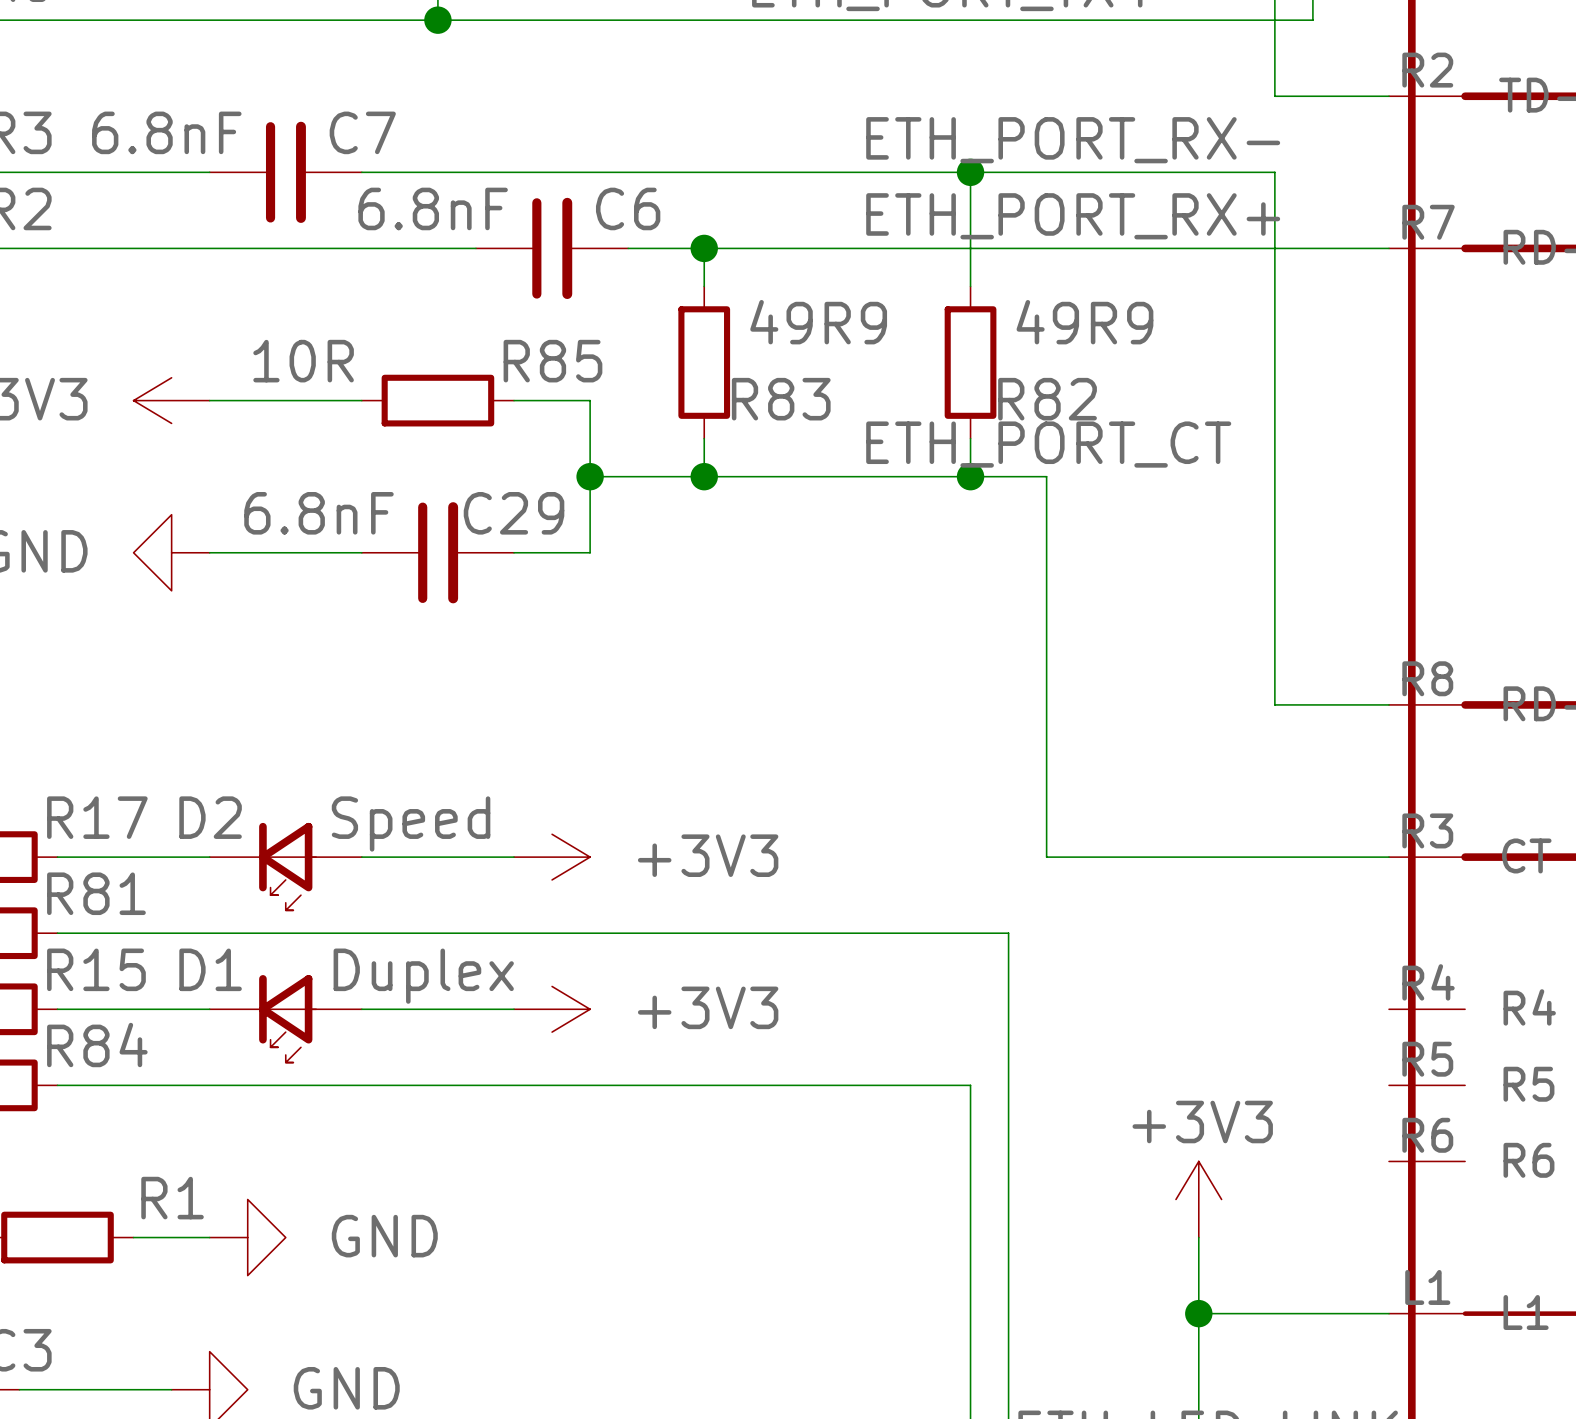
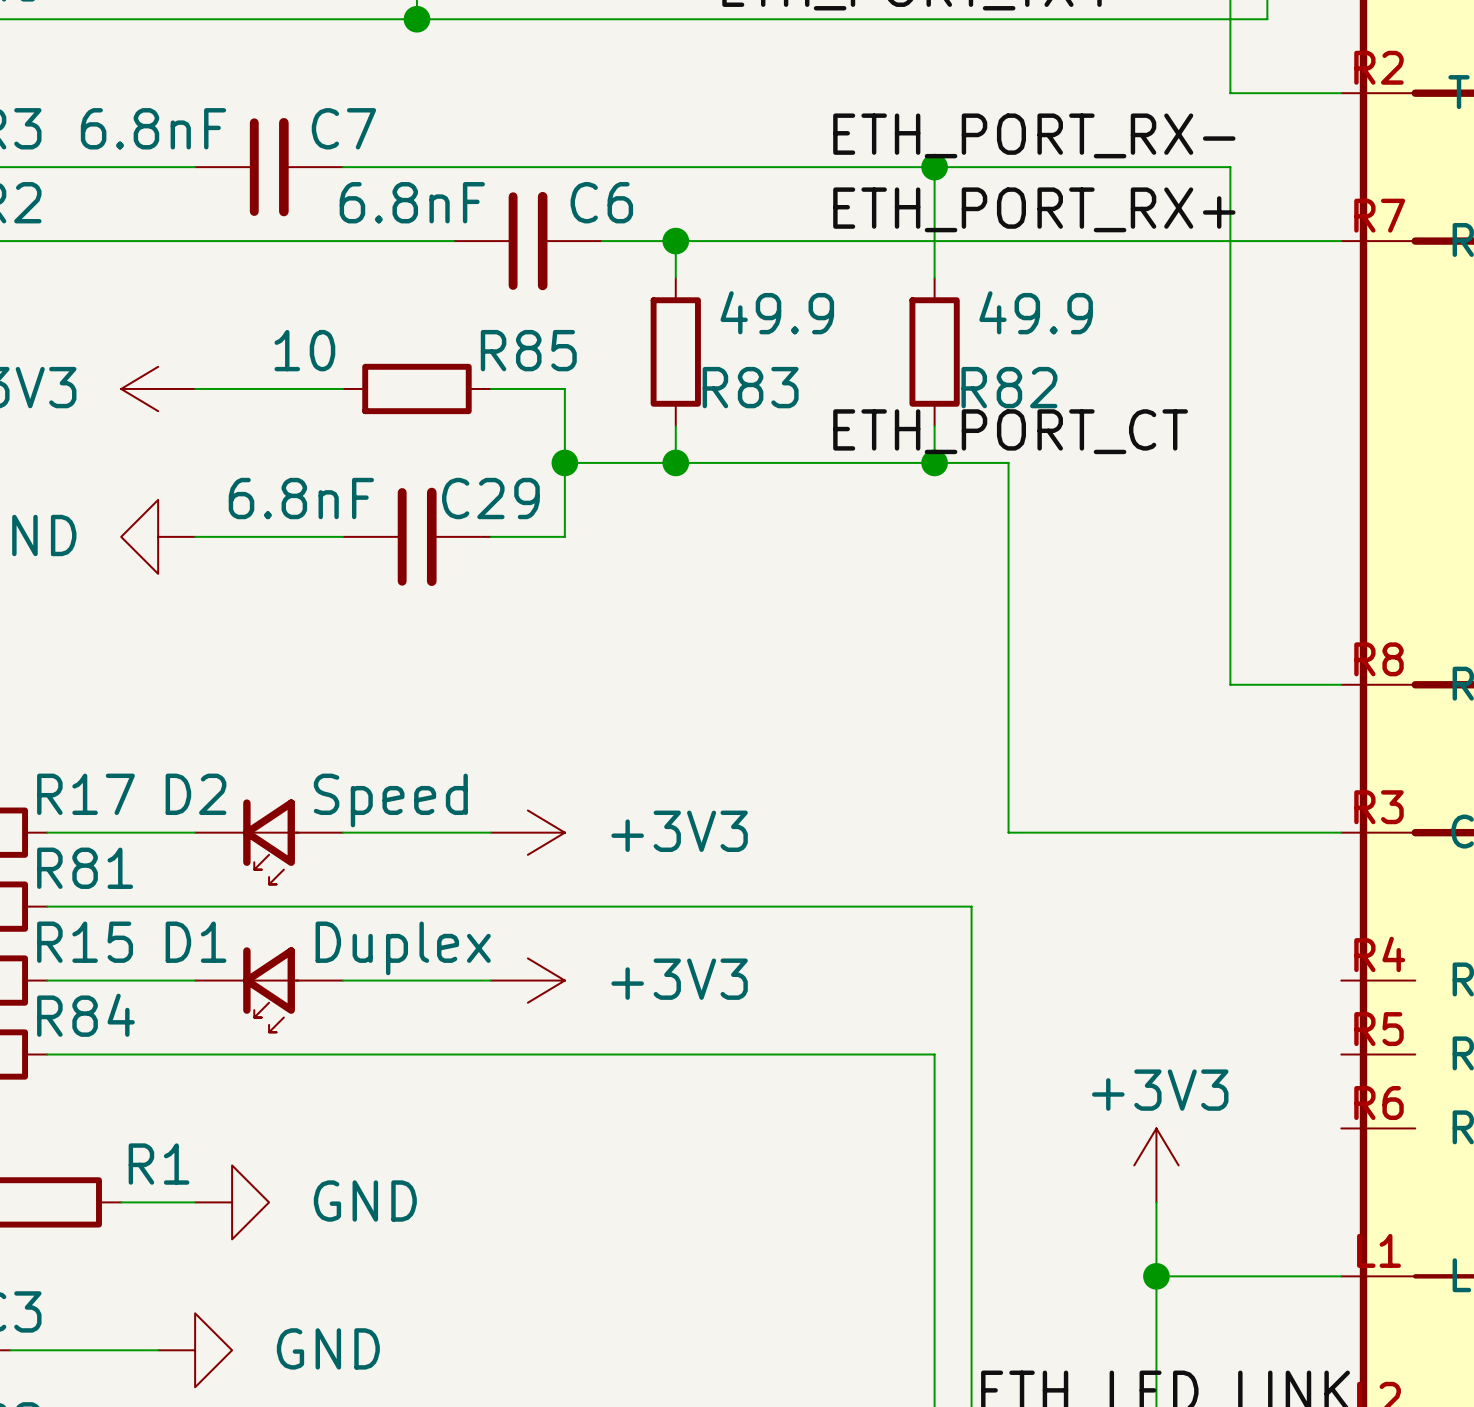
R83 value: 49R9 (818, 322) -> 49.9 (777, 312)
R82 value: 49R9 (1084, 322) -> 49.9 (1036, 312)
R85 value: 10R (303, 361) -> 10 (304, 350)

